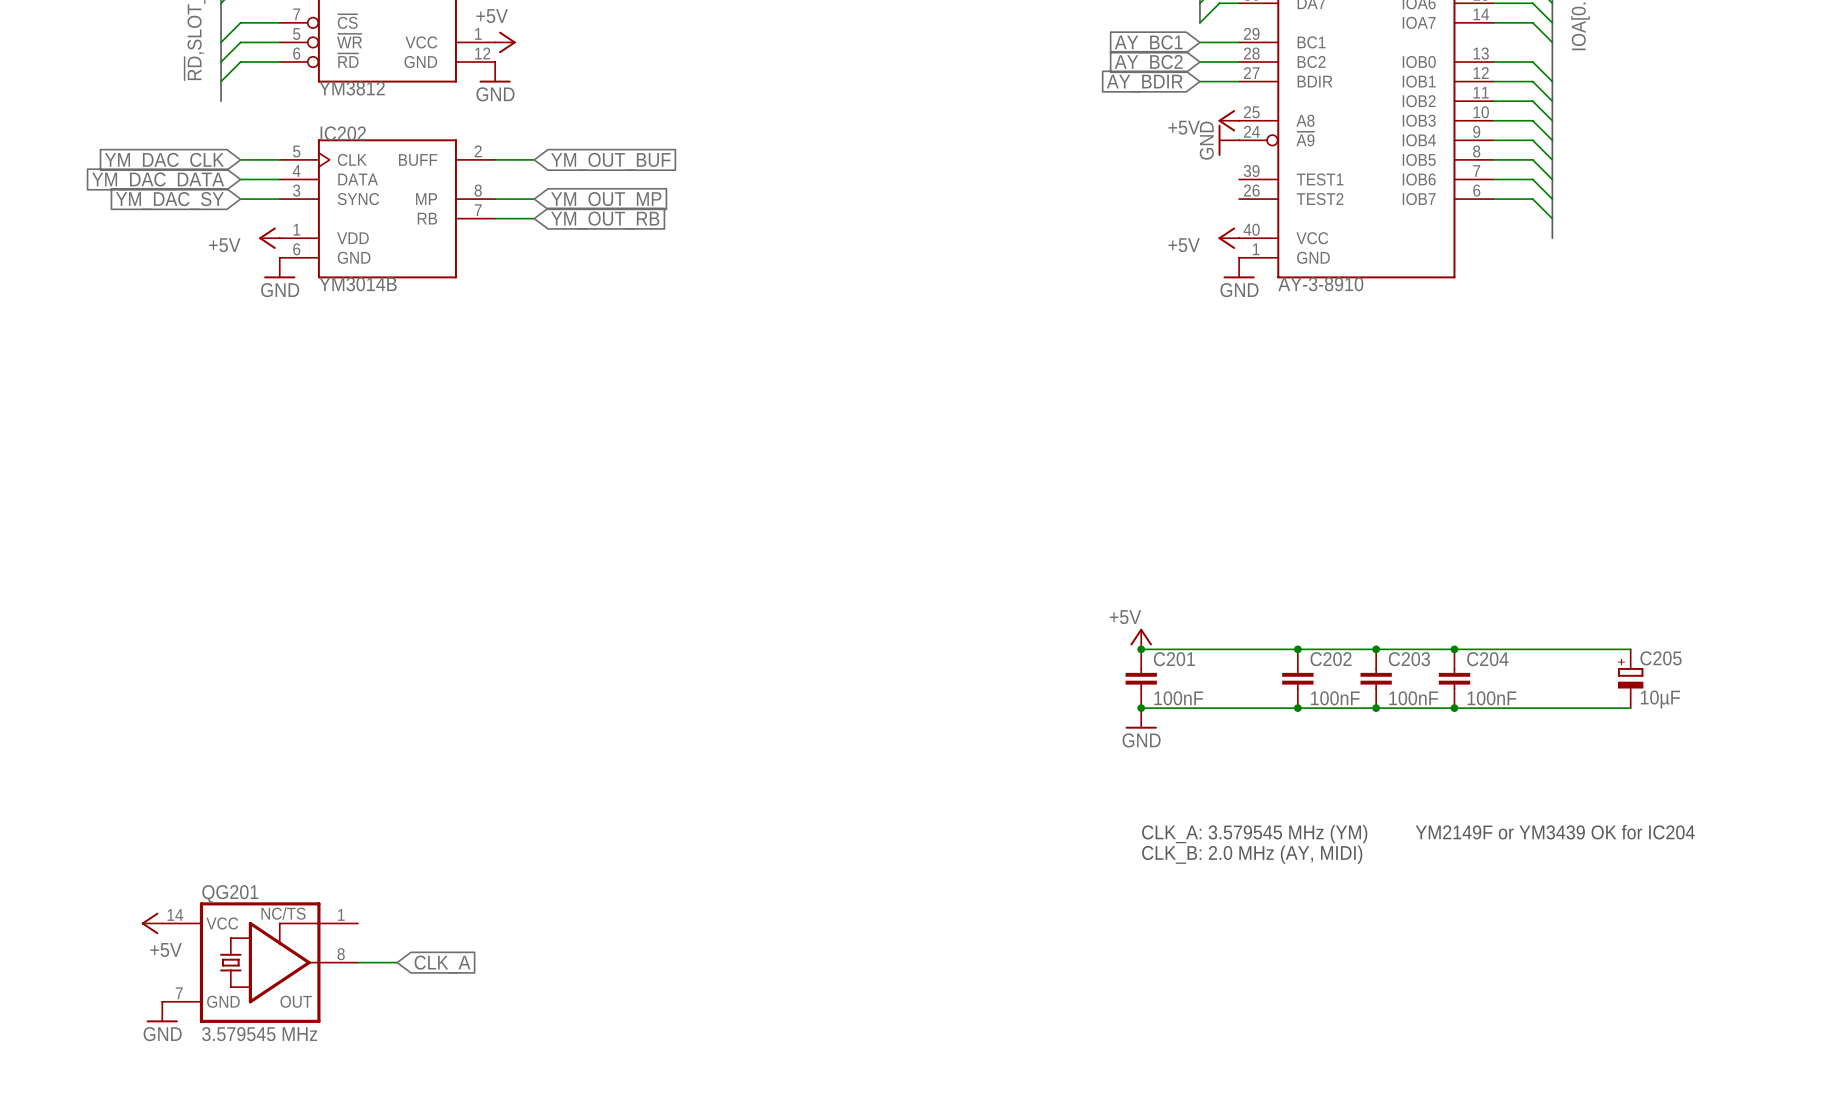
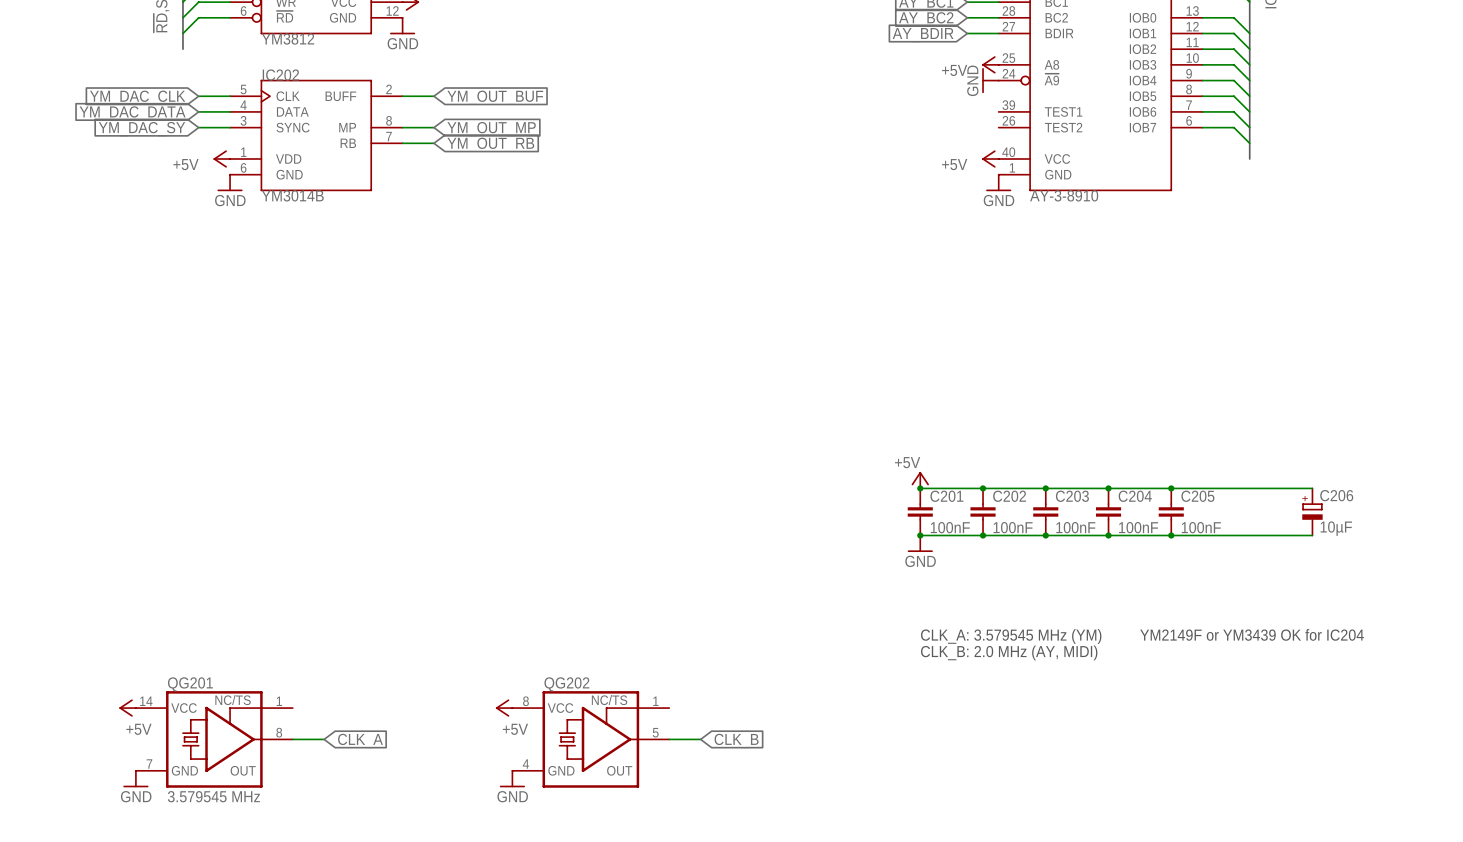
junction: none -> (983, 488)
C205 name: C205 (1661, 658) -> C206 (1336, 495)
C202 name: C202 (1331, 659) -> C203 (1072, 496)
C203 name: C203 (1409, 659) -> C204 (1135, 496)
C204 name: C204 (1487, 659) -> C205 (1197, 496)
C202: none -> 100nF (983, 511)
junction: none -> (983, 535)
power symbol: none -> +5V (504, 708)
QG202: none -> (590, 739)
wire: none -> (669, 739) (700, 739)
global label: none -> CLK_B (736, 740)
power symbol: none -> GND (512, 779)

